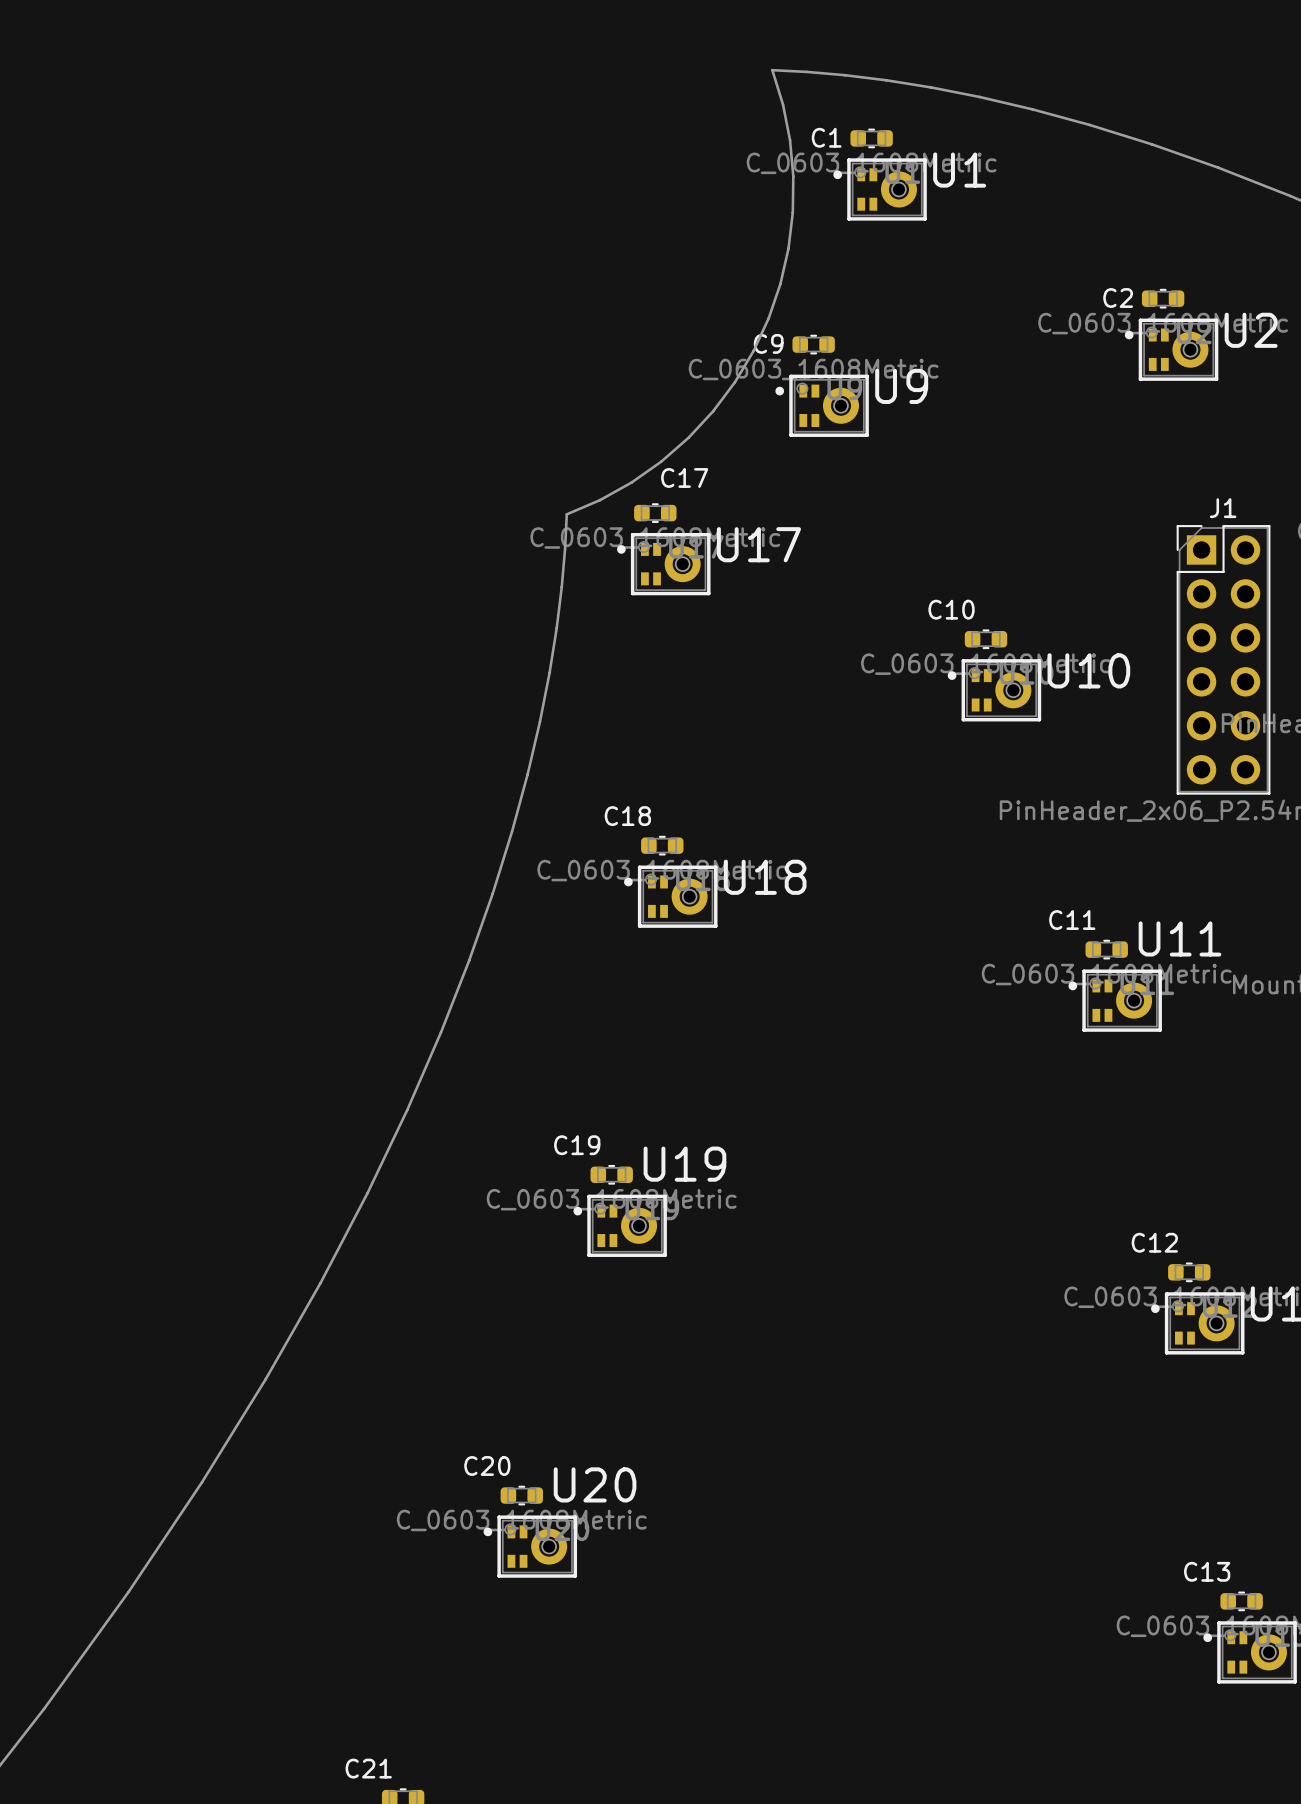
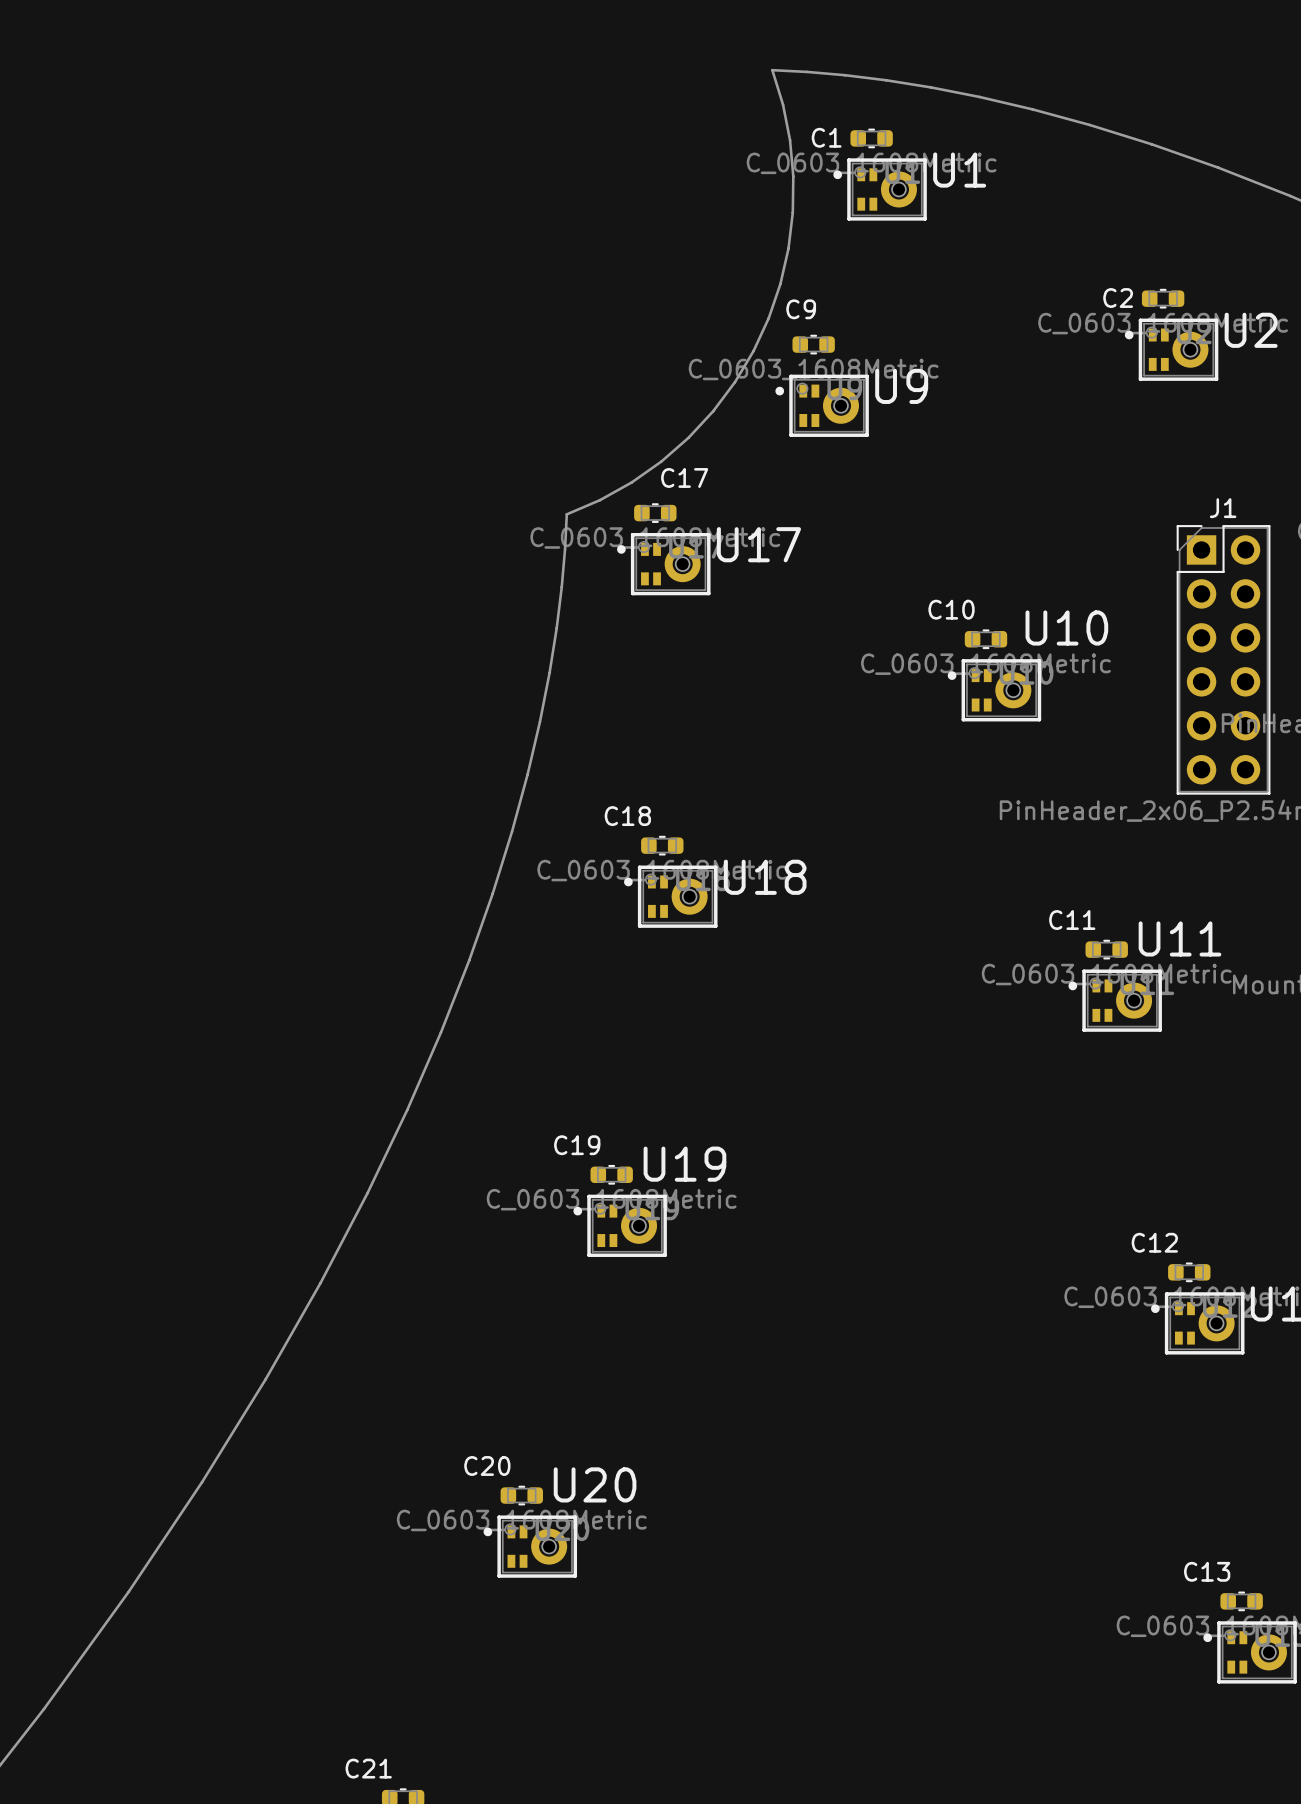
C9 name position: C9 (768, 343) -> C9 (801, 309)
U10 name position: U10 (1088, 670) -> U10 (1066, 628)

